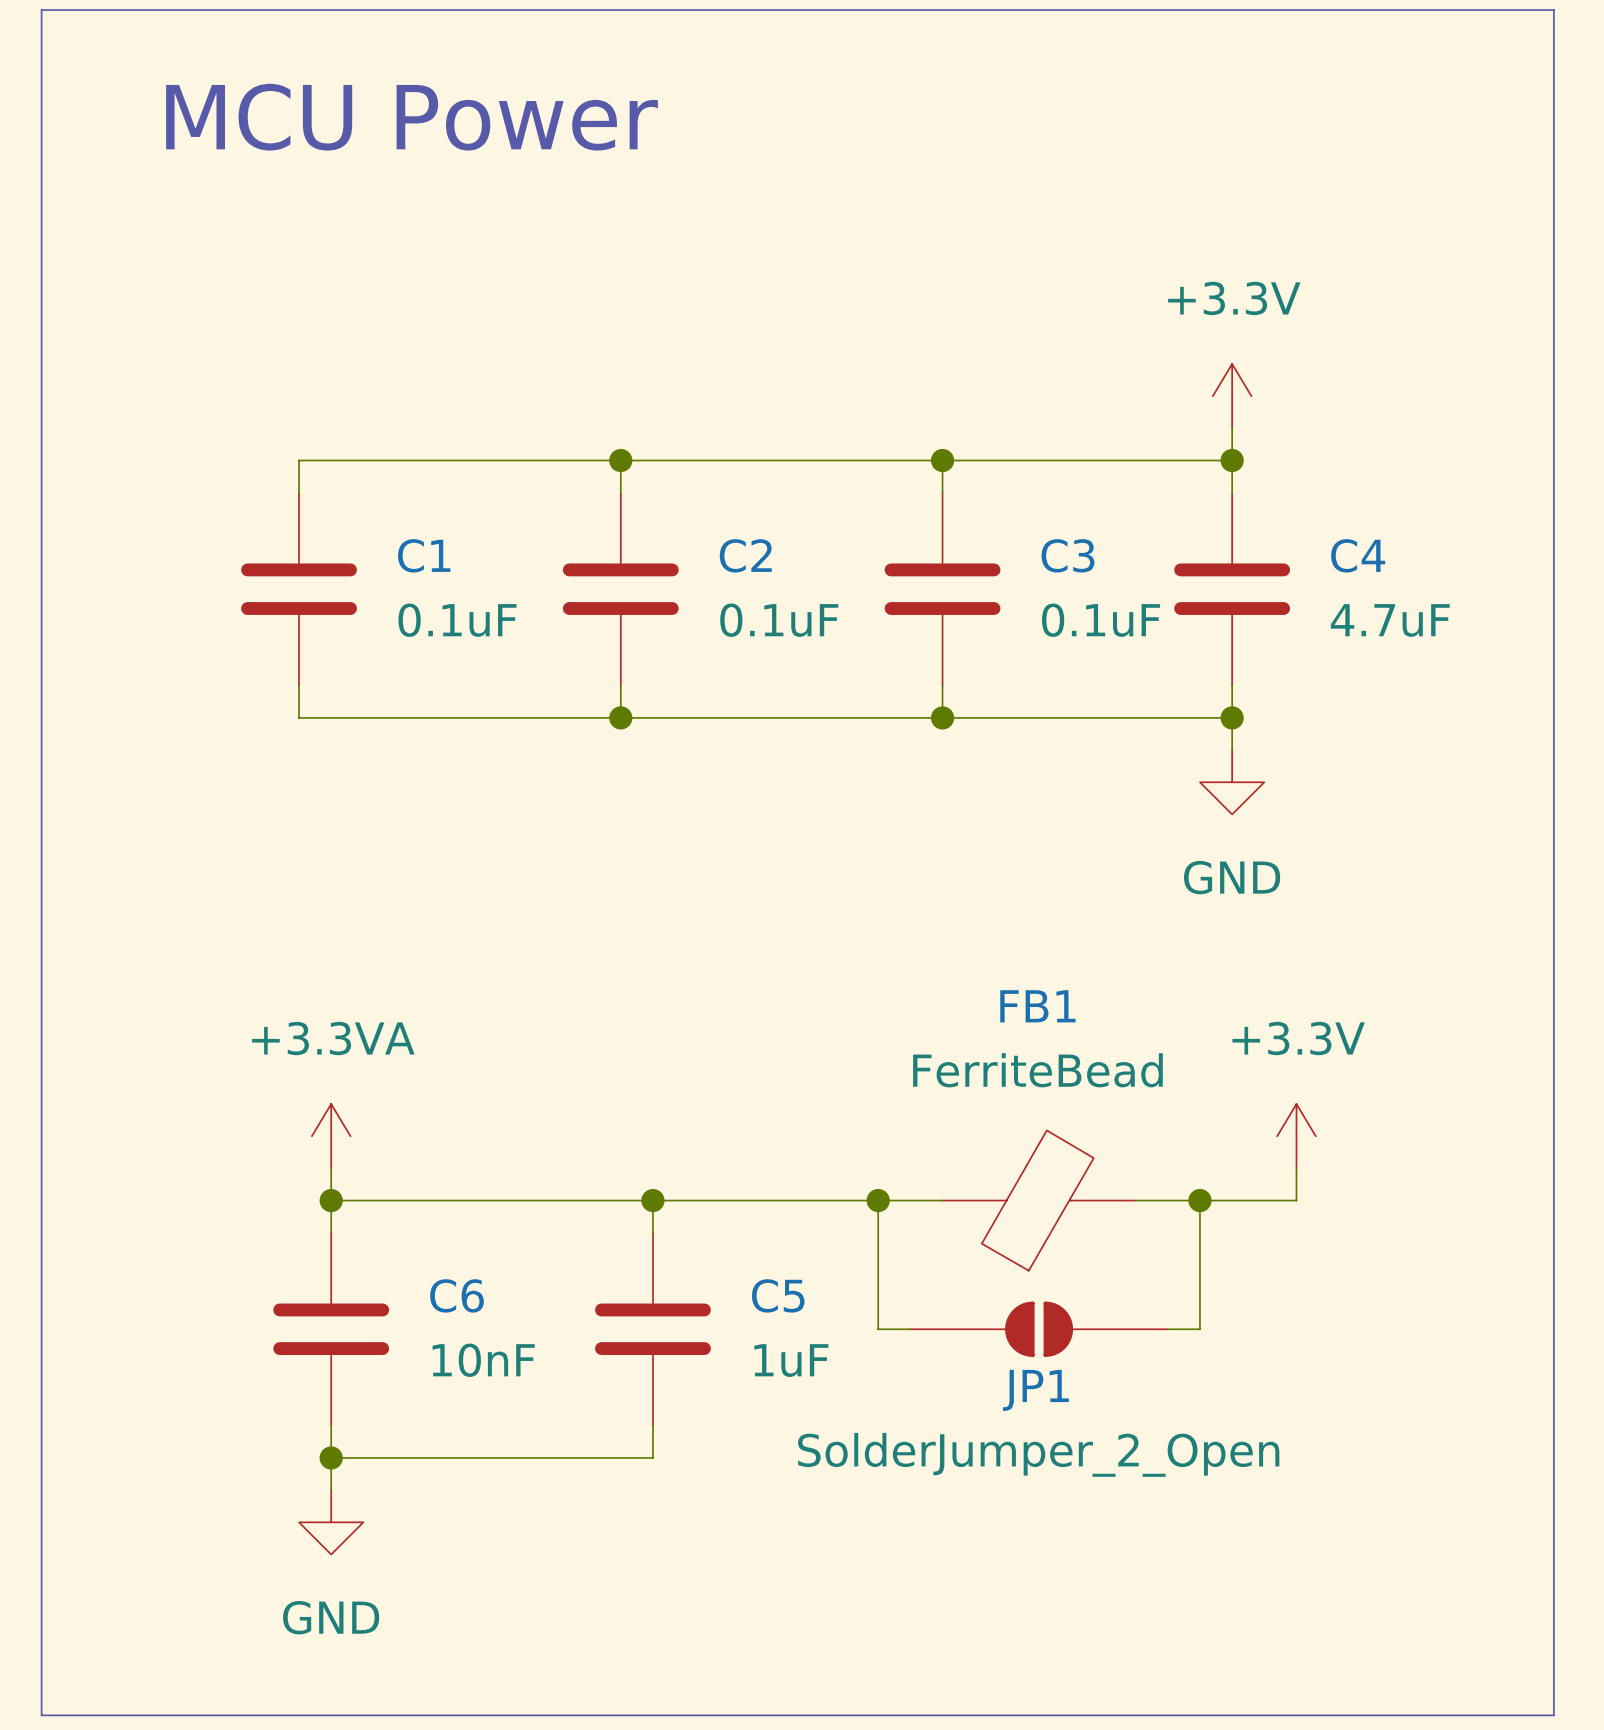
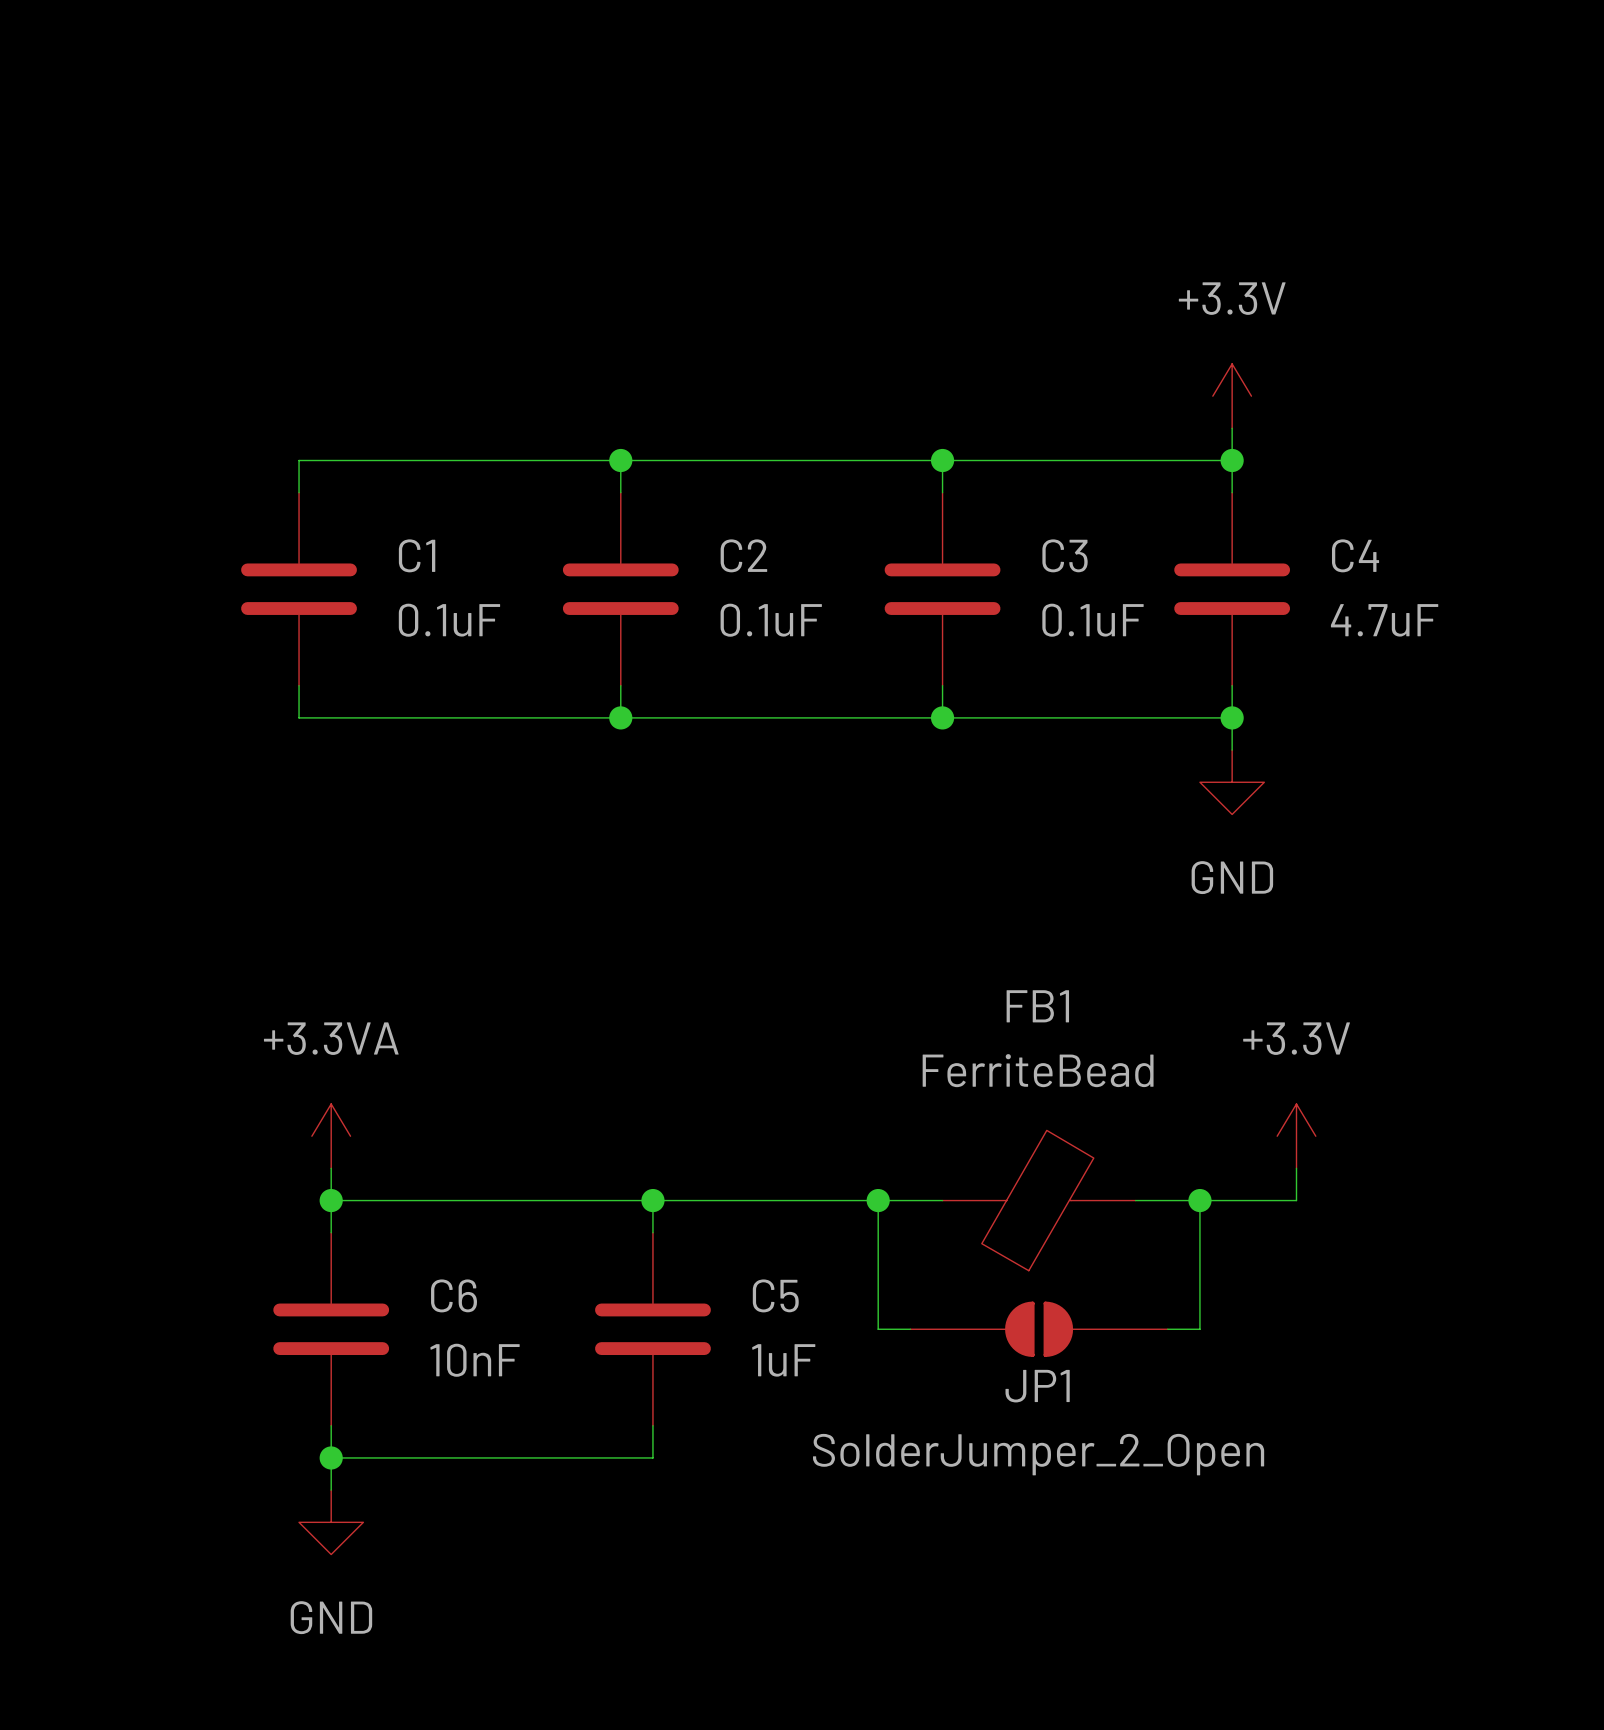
line: (41, 10) (1553, 10) (1553, 1715) (41, 1715) (41, 10) -> none
text: MCU Power (412, 117) -> none

